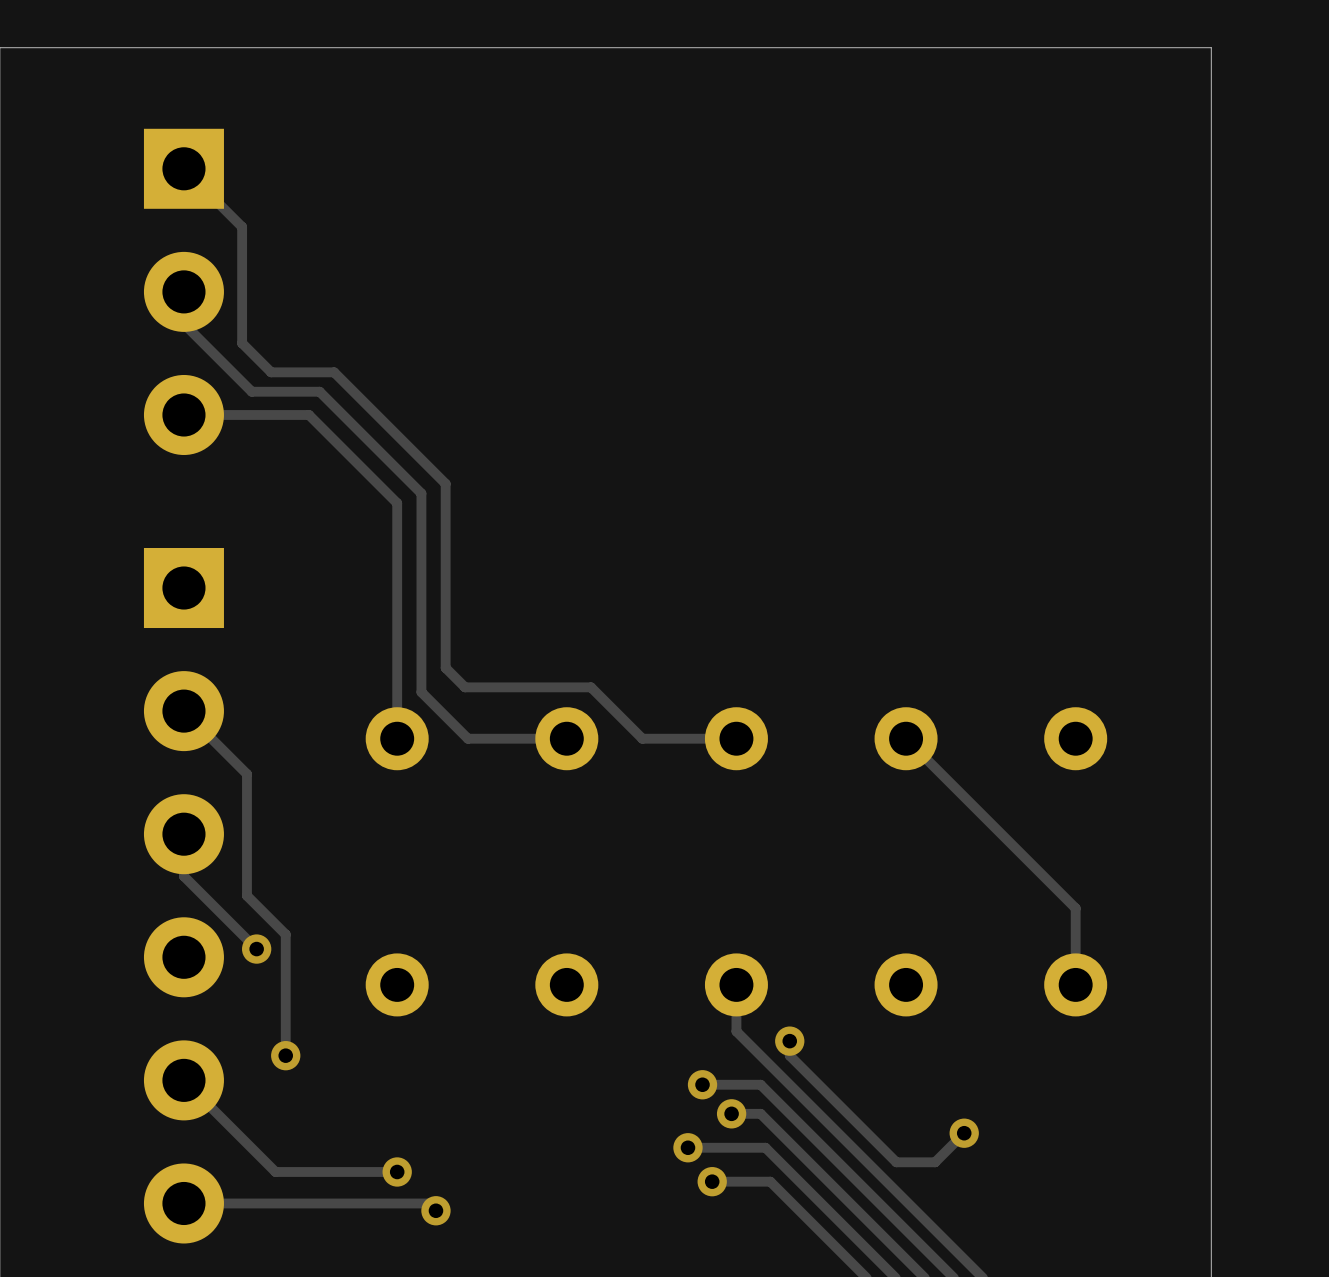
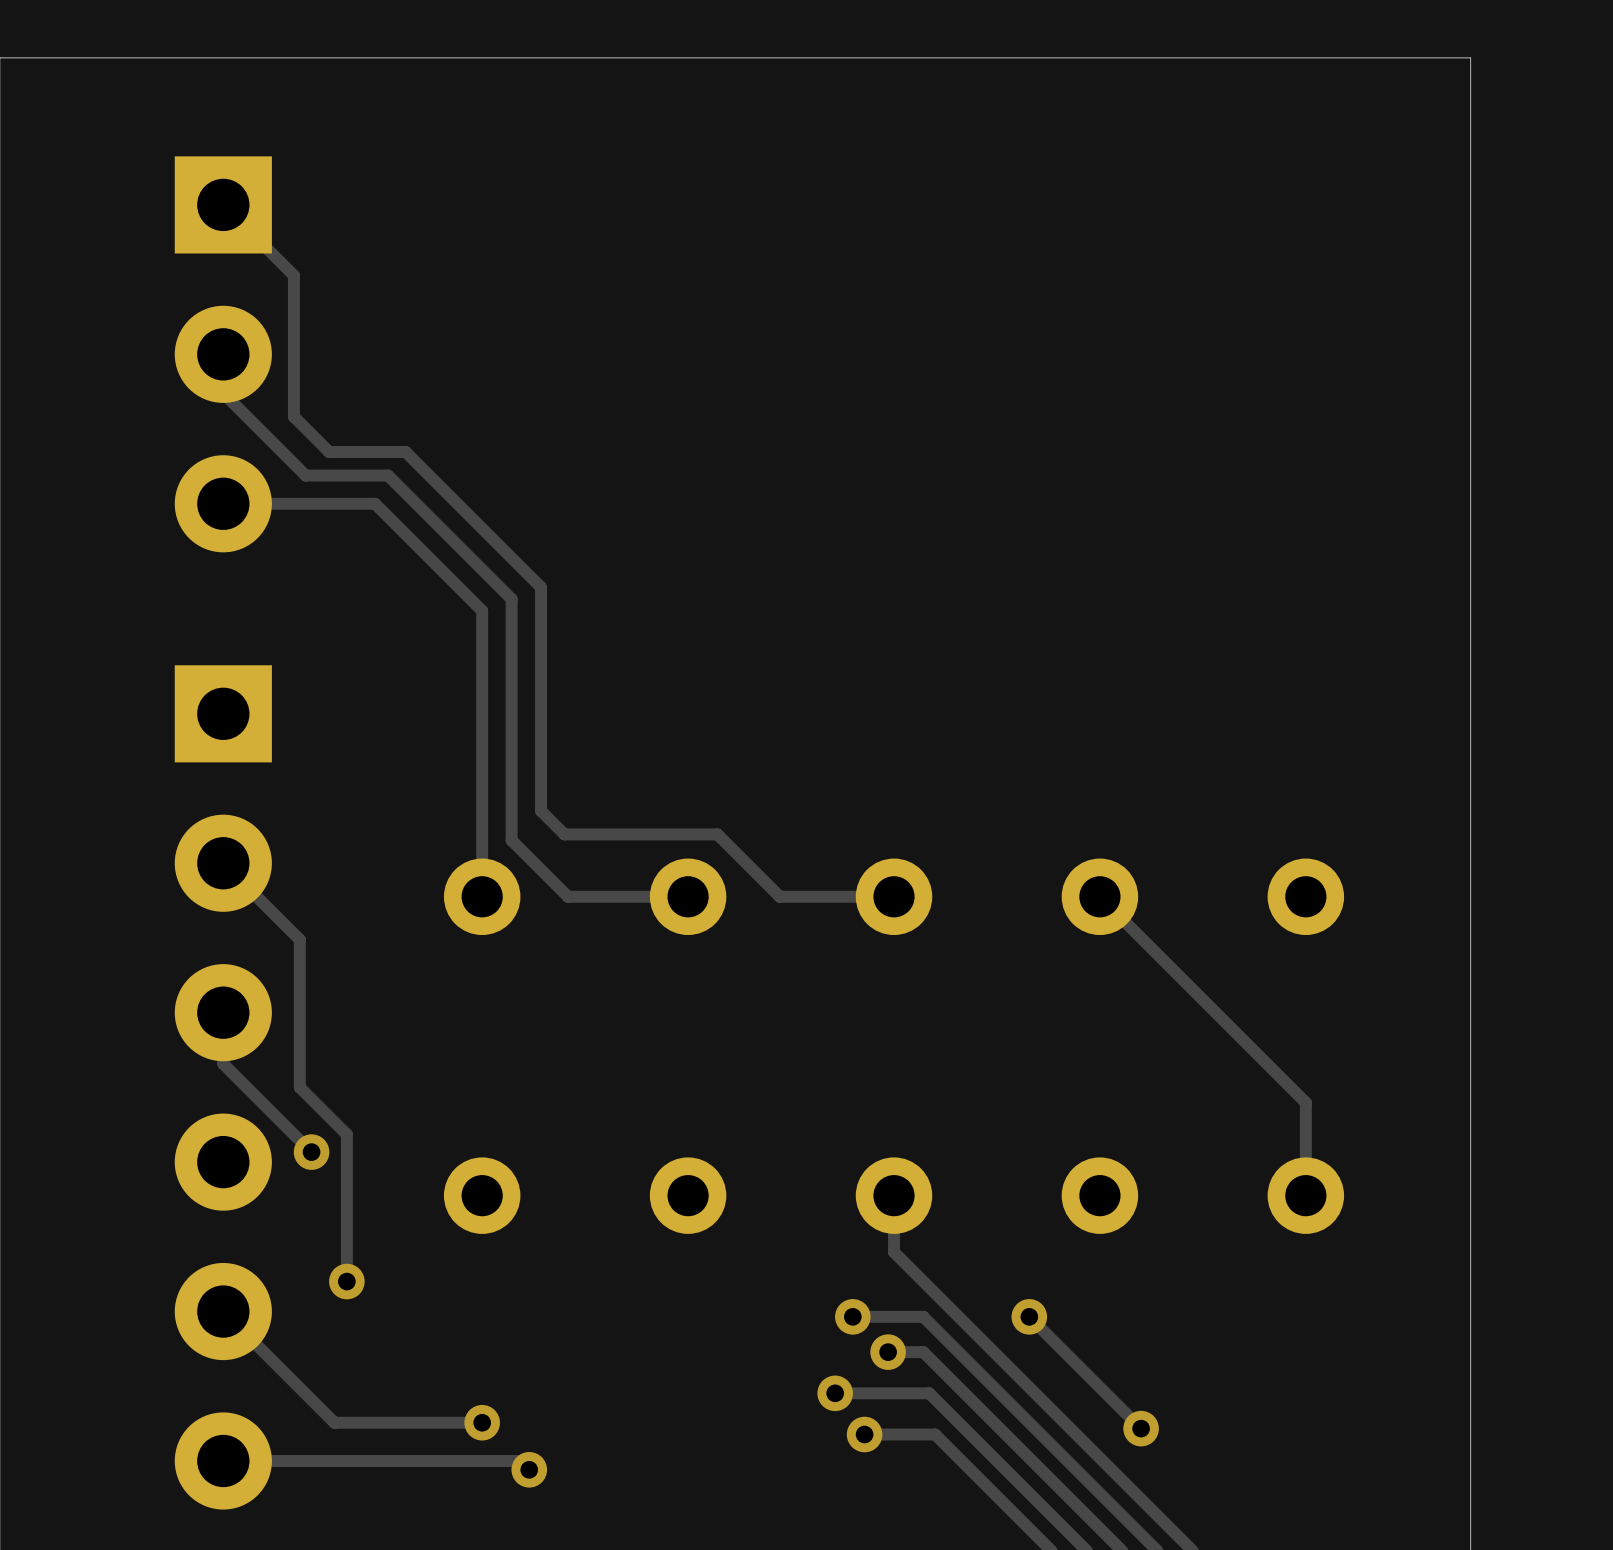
track: (789, 1041) (789, 1055) (896, 1162) (935, 1162) (964, 1133) -> none
via: (789, 1041) -> none
track: none -> (1029, 1316) (1141, 1428)
via: none -> (1029, 1316)
via position: (964, 1133) -> (1141, 1428)

